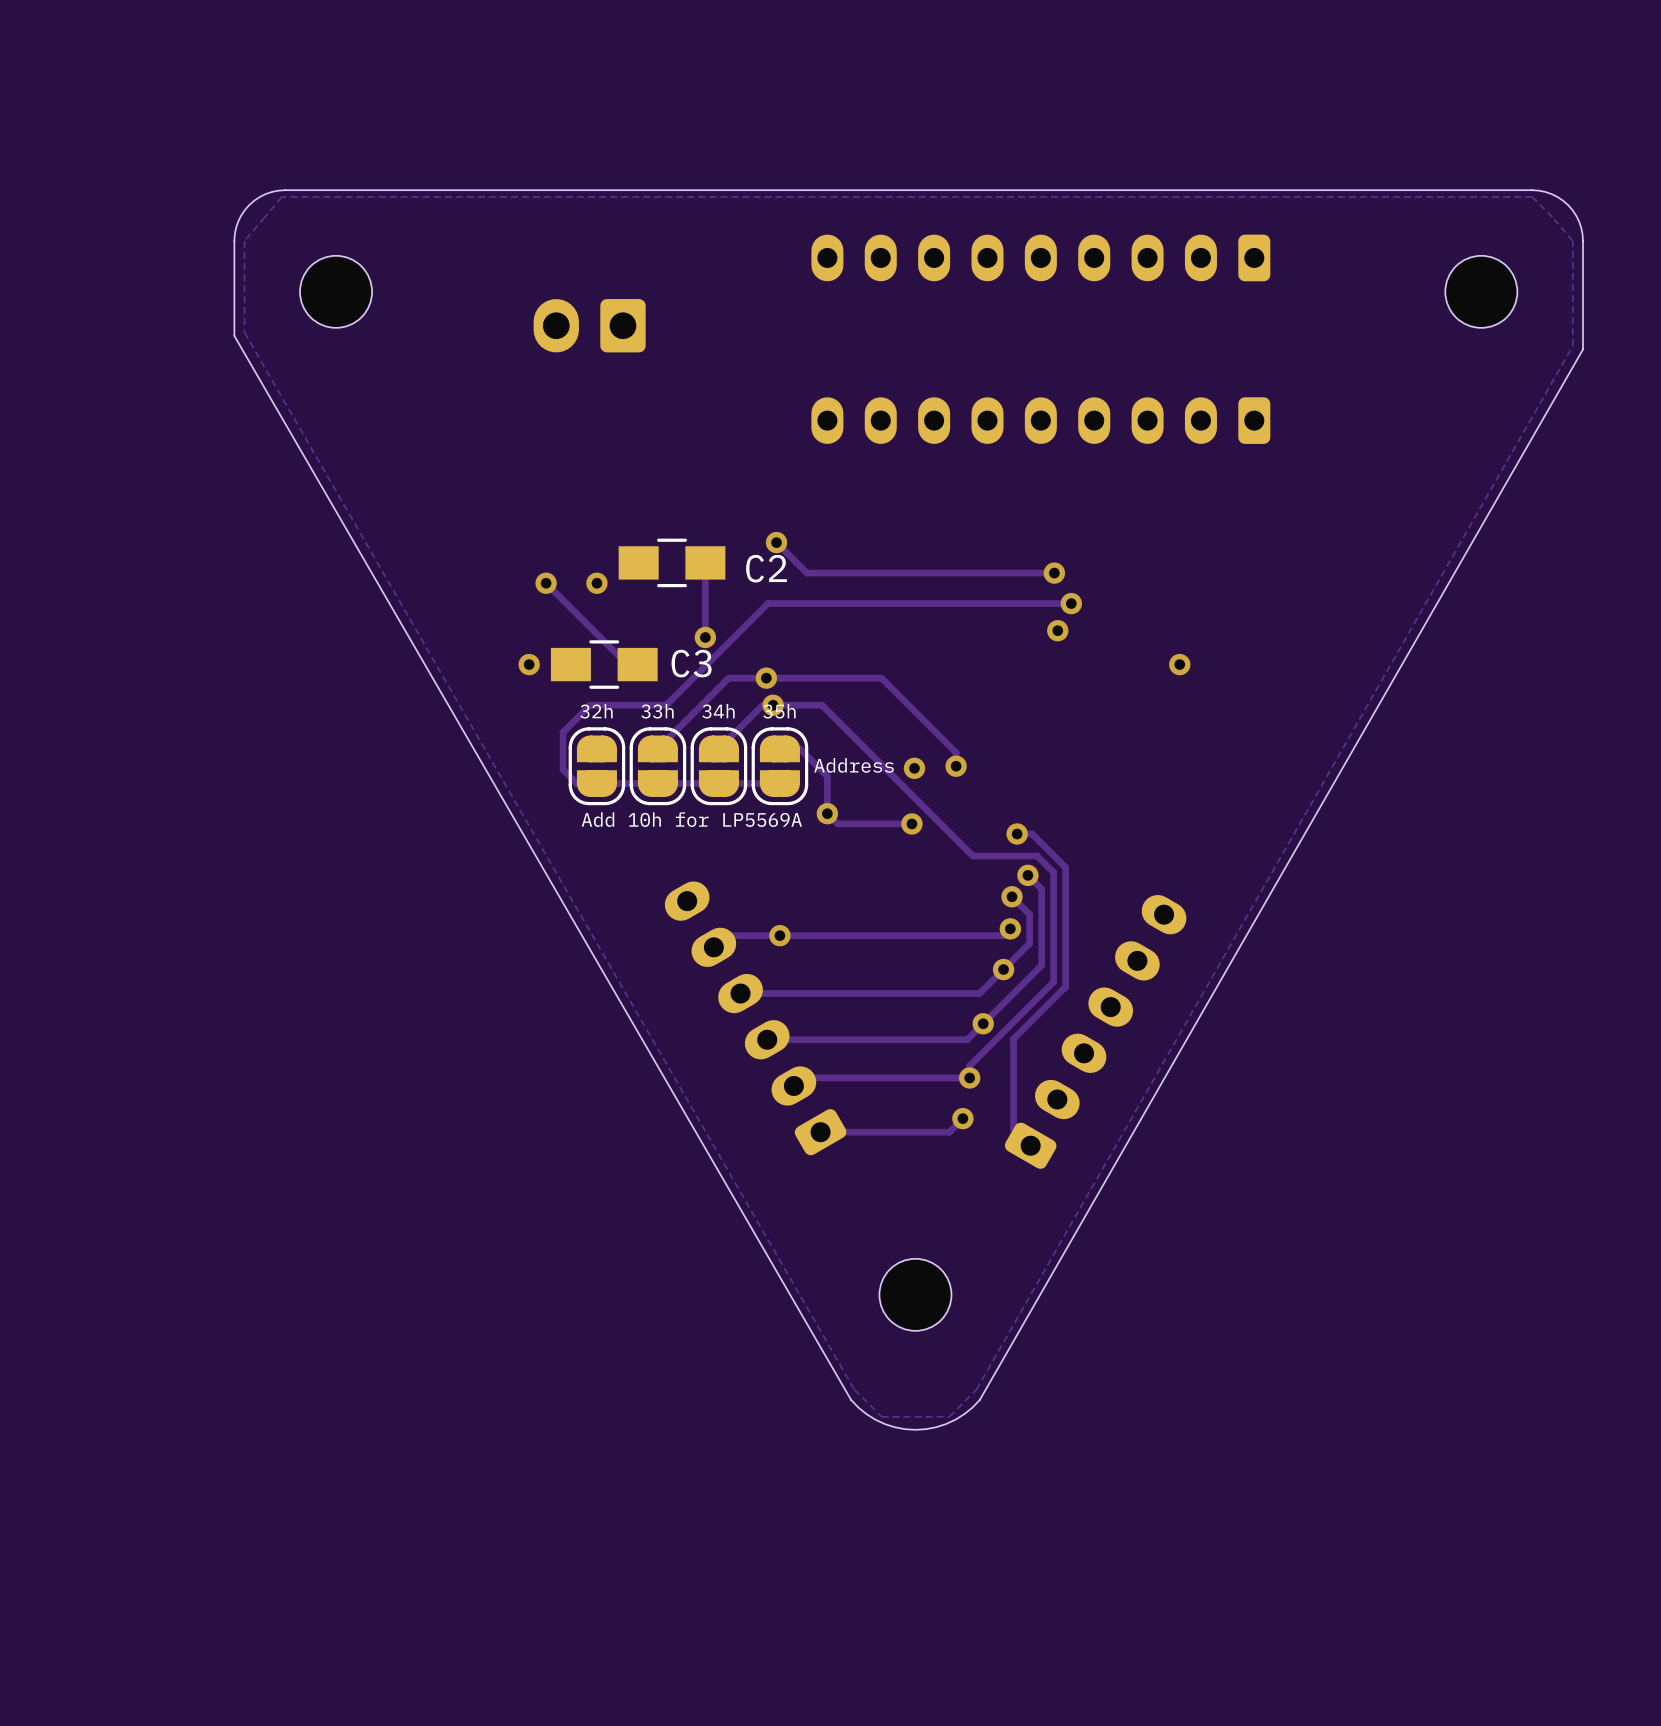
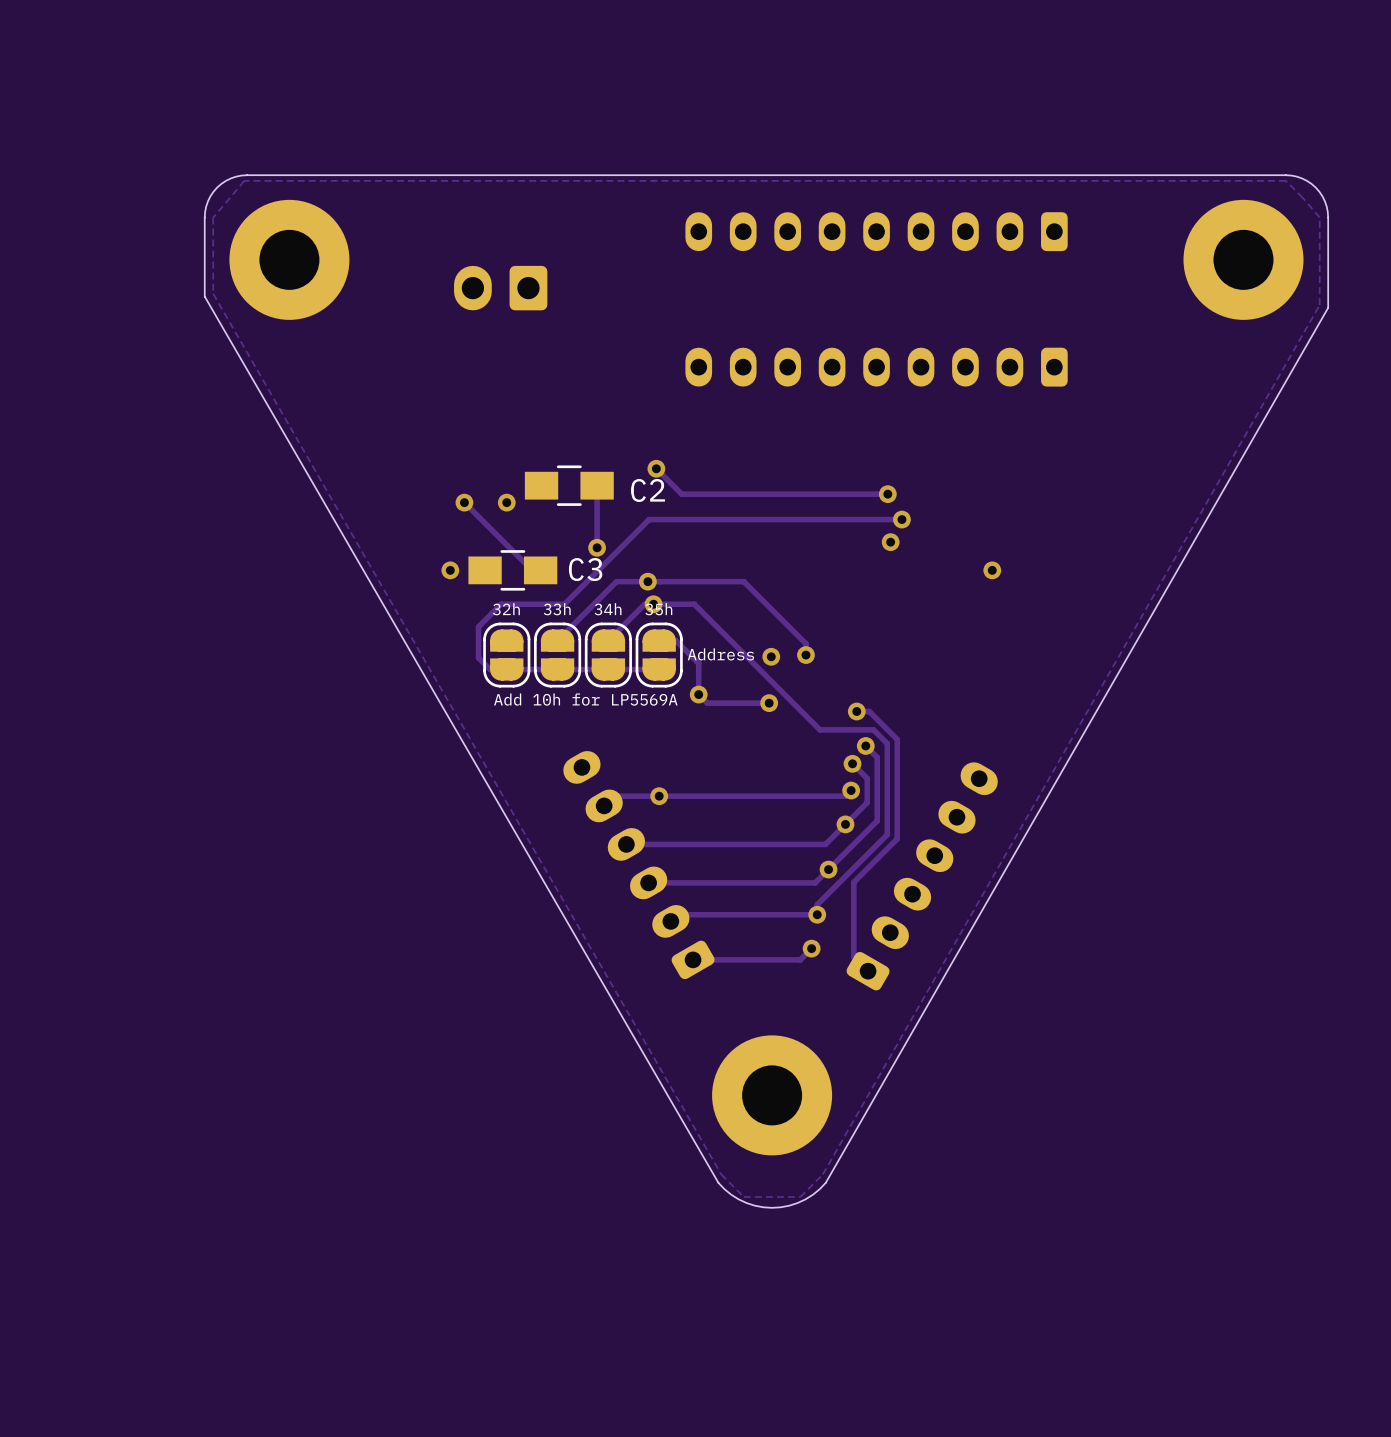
part footprint: [300, 255, 373, 328] -> [229, 199, 350, 320]
part footprint: [1445, 255, 1518, 328] -> [1183, 199, 1304, 320]
part footprint: [879, 1258, 952, 1331] -> [712, 1035, 833, 1156]

